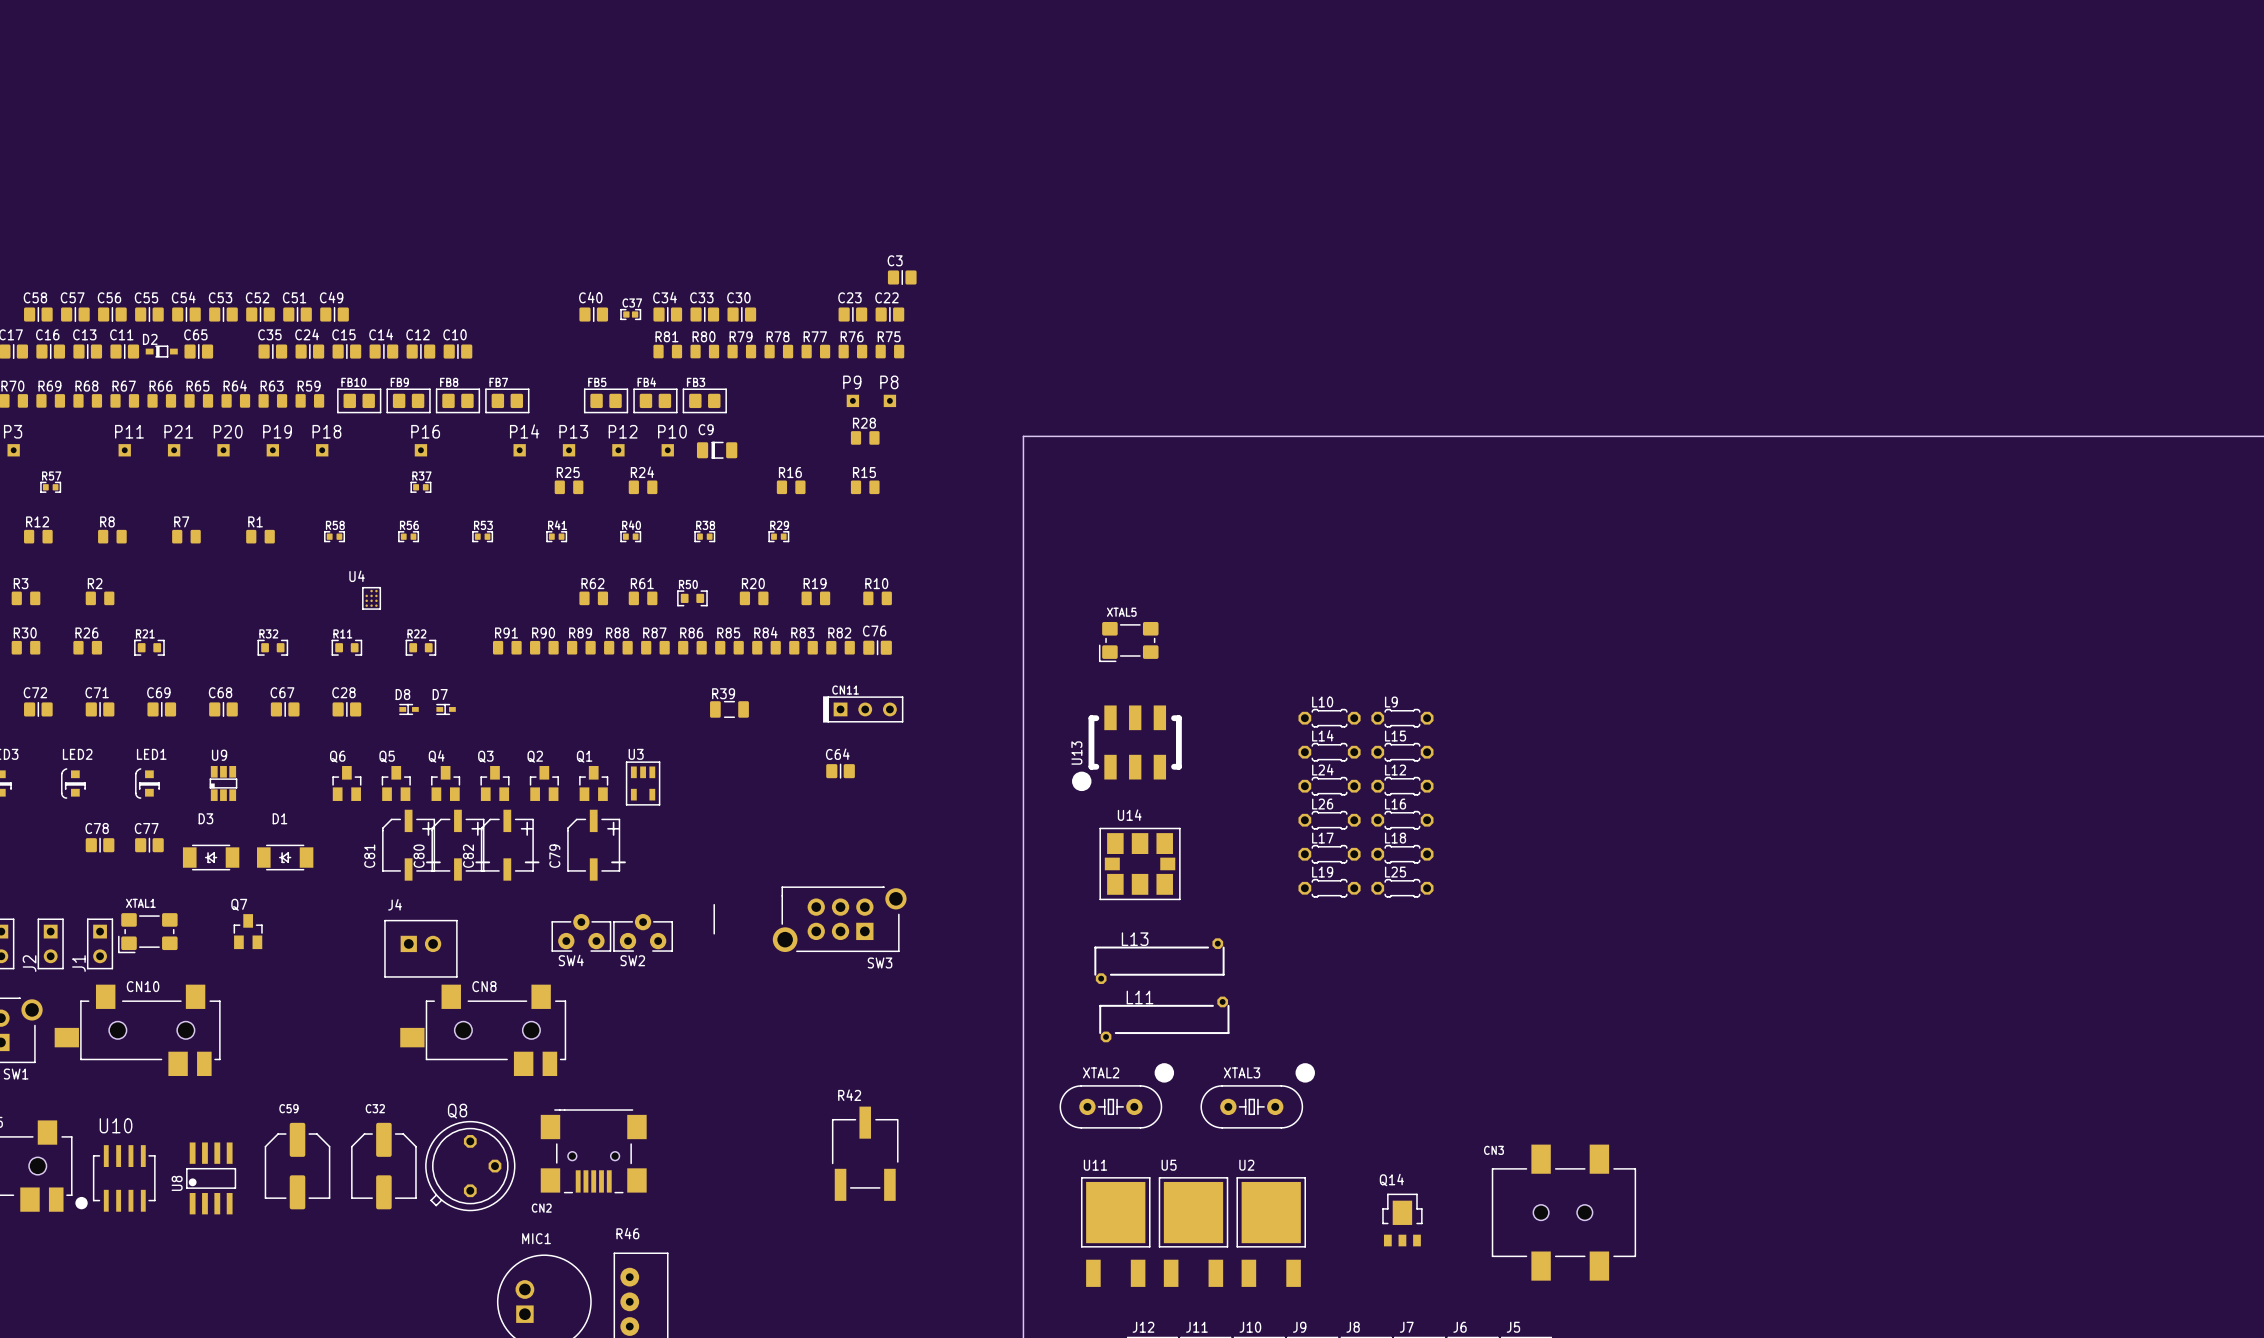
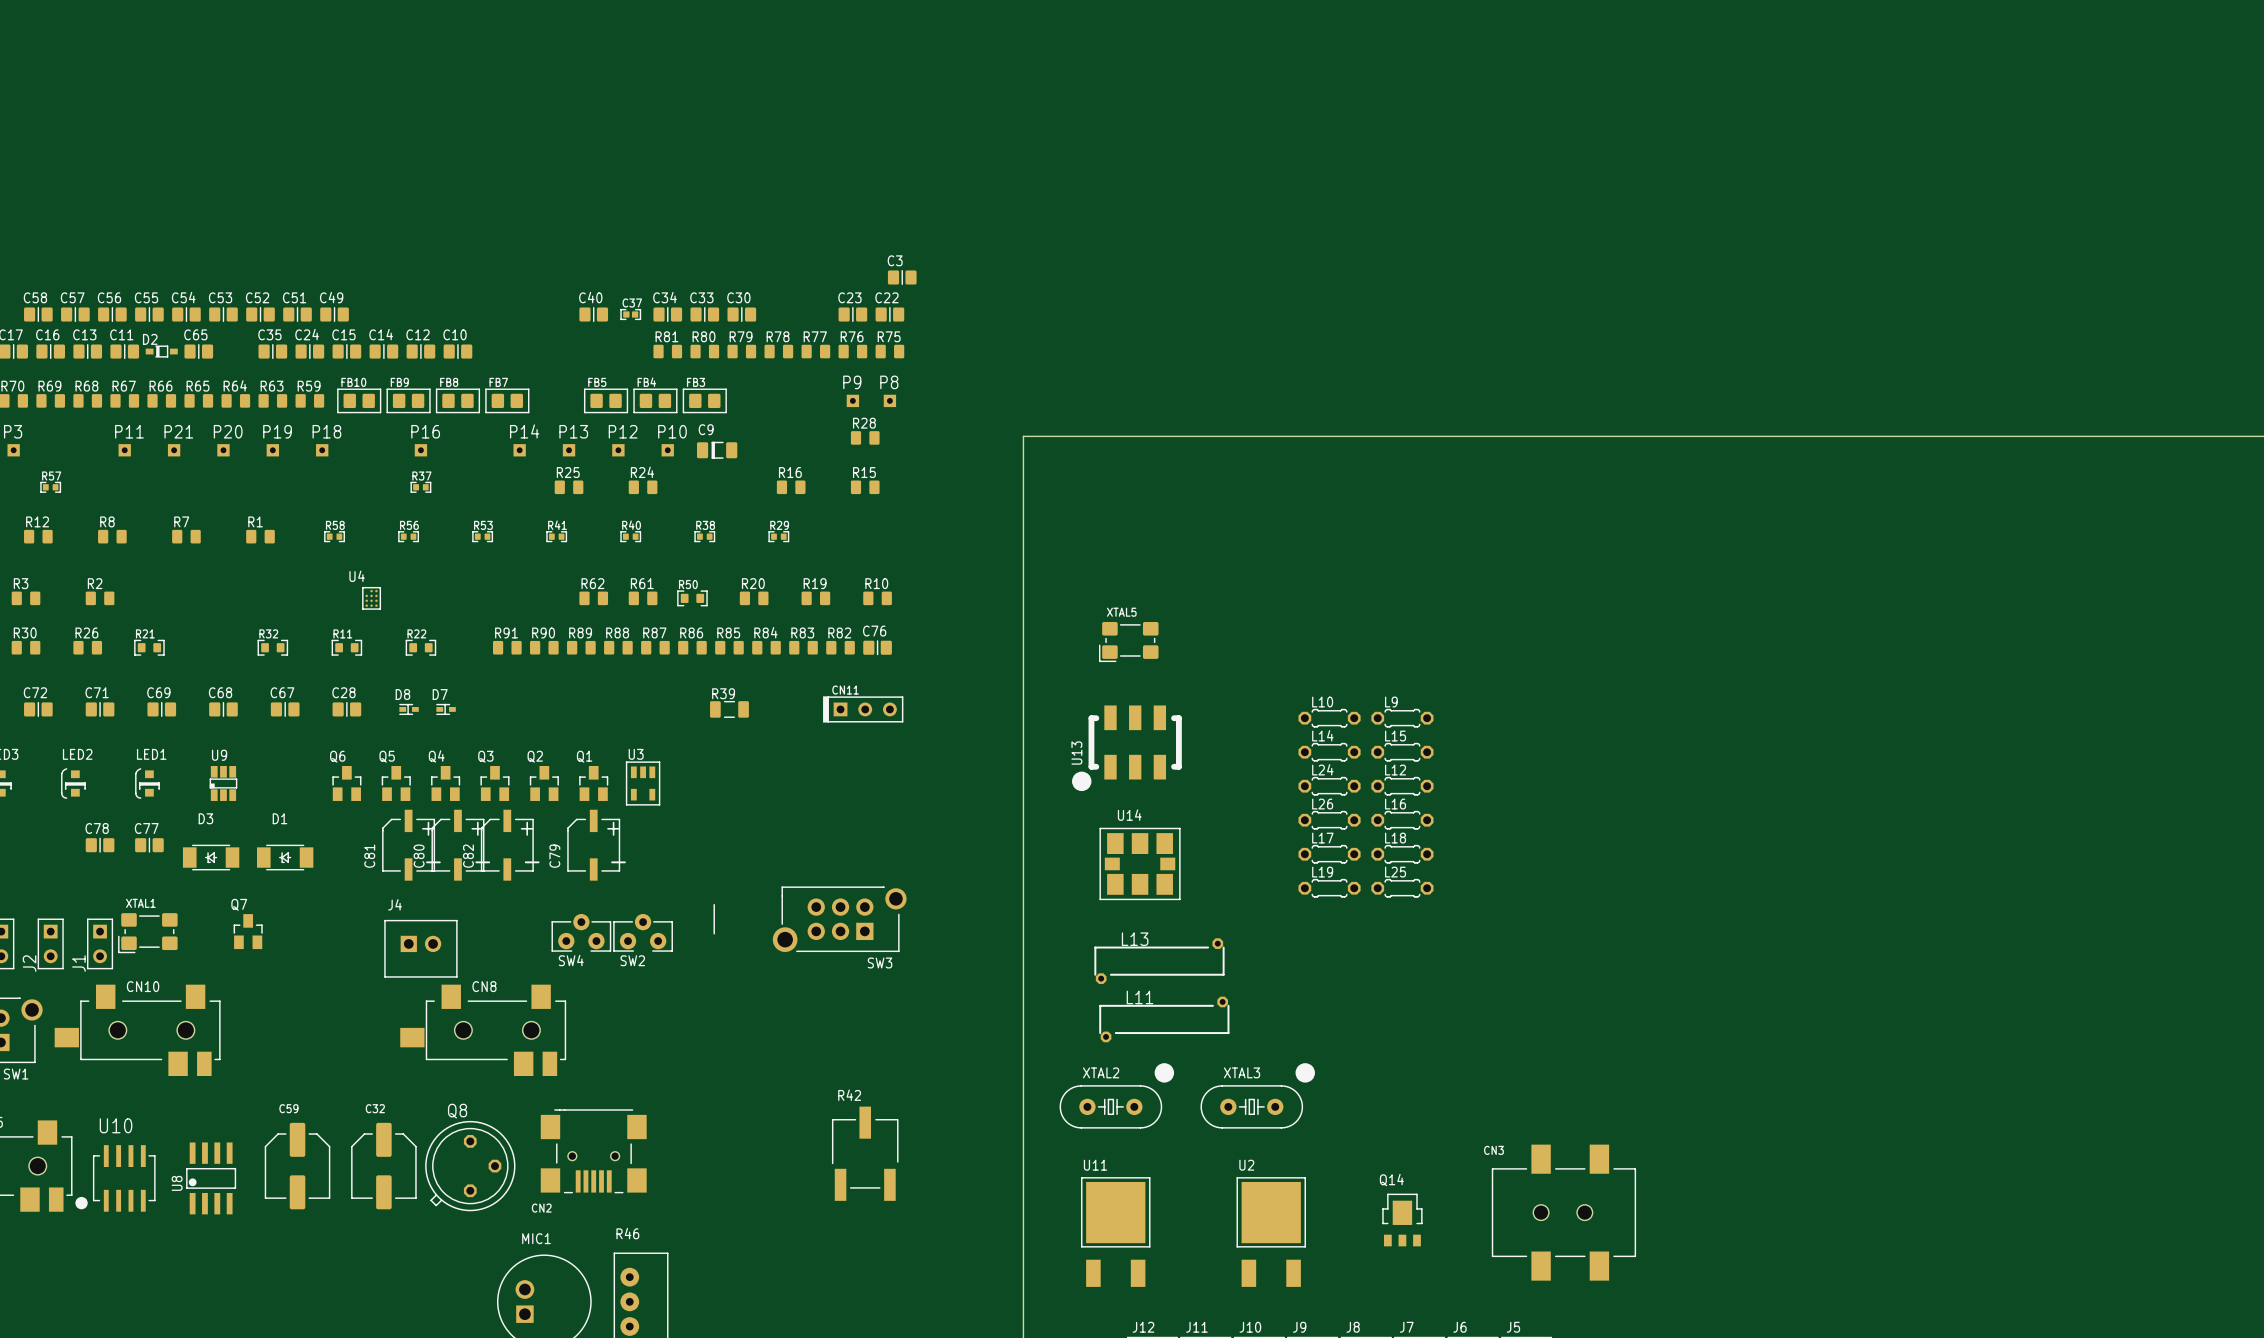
C64: (840, 771) -> none
U5: (1193, 1232) -> none

